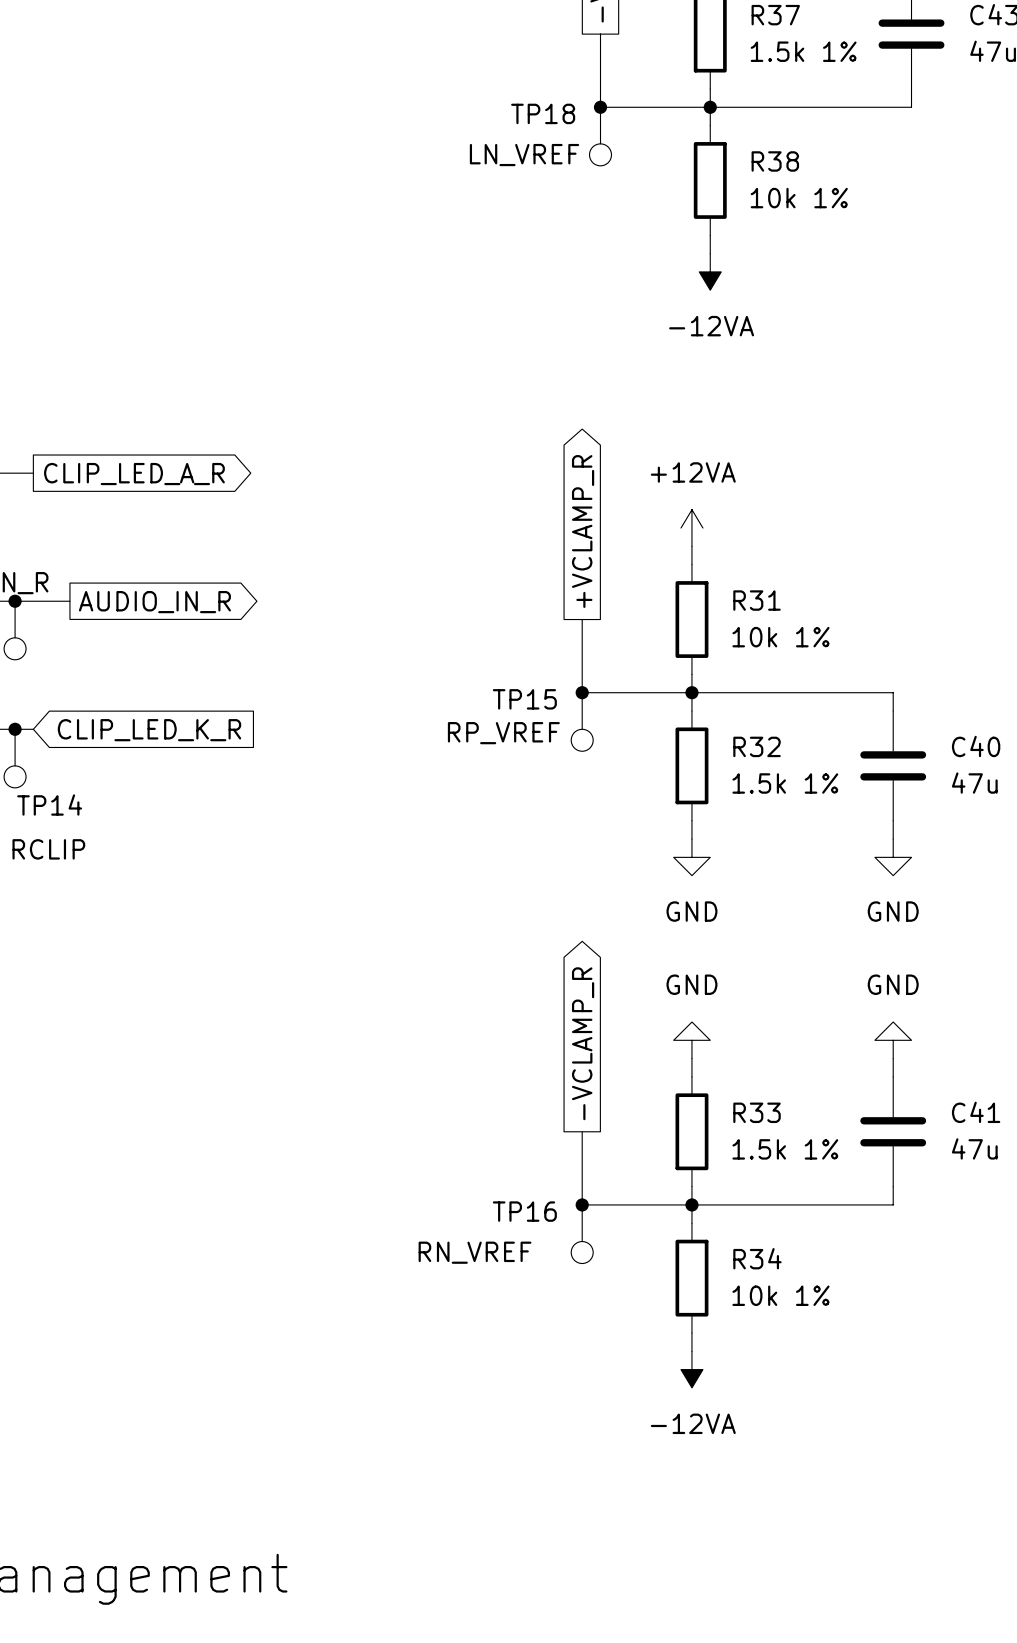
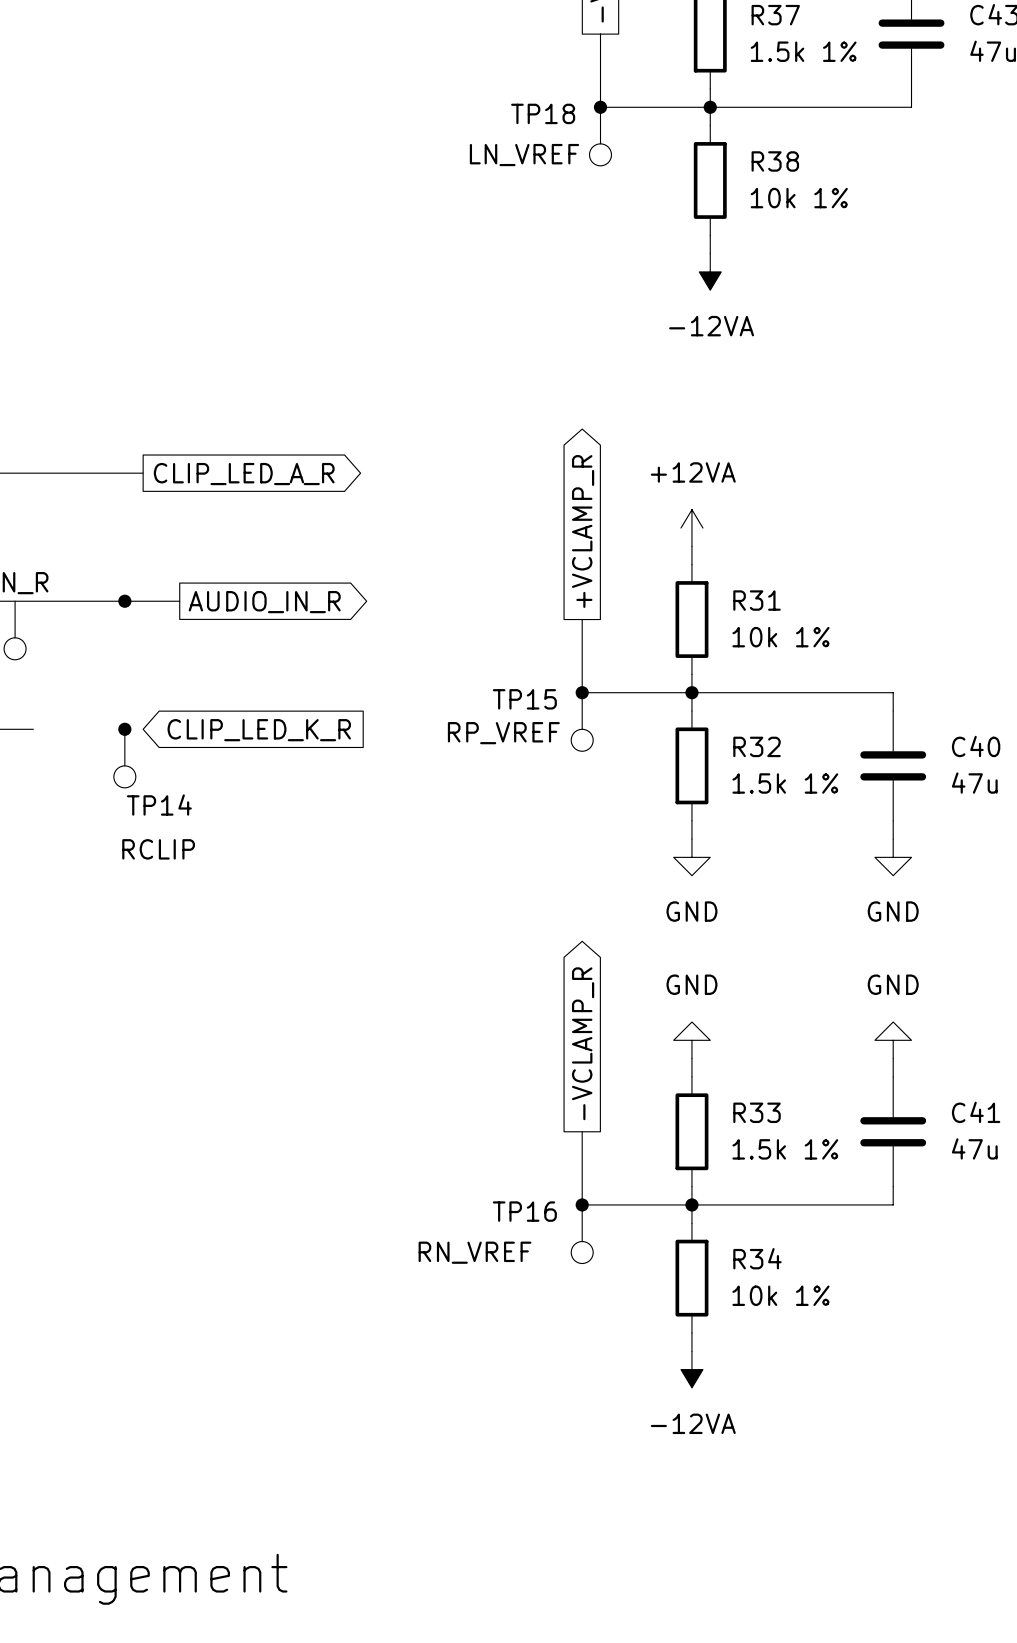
wire: none -> (33, 473) (143, 473)
global label position: CLIP_LED_A_R (134, 474) -> CLIP_LED_A_R (244, 474)
junction: (15, 601) -> none
wire: none -> (69, 601) (179, 601)
junction: none -> (124, 601)
global label position: AUDIO_IN_R (154, 602) -> AUDIO_IN_R (264, 602)
junction: (15, 729) -> none
junction: none -> (124, 729)
global label position: CLIP_LED_K_R (149, 730) -> CLIP_LED_K_R (259, 730)
TP14 position: (15, 758) -> (124, 758)

